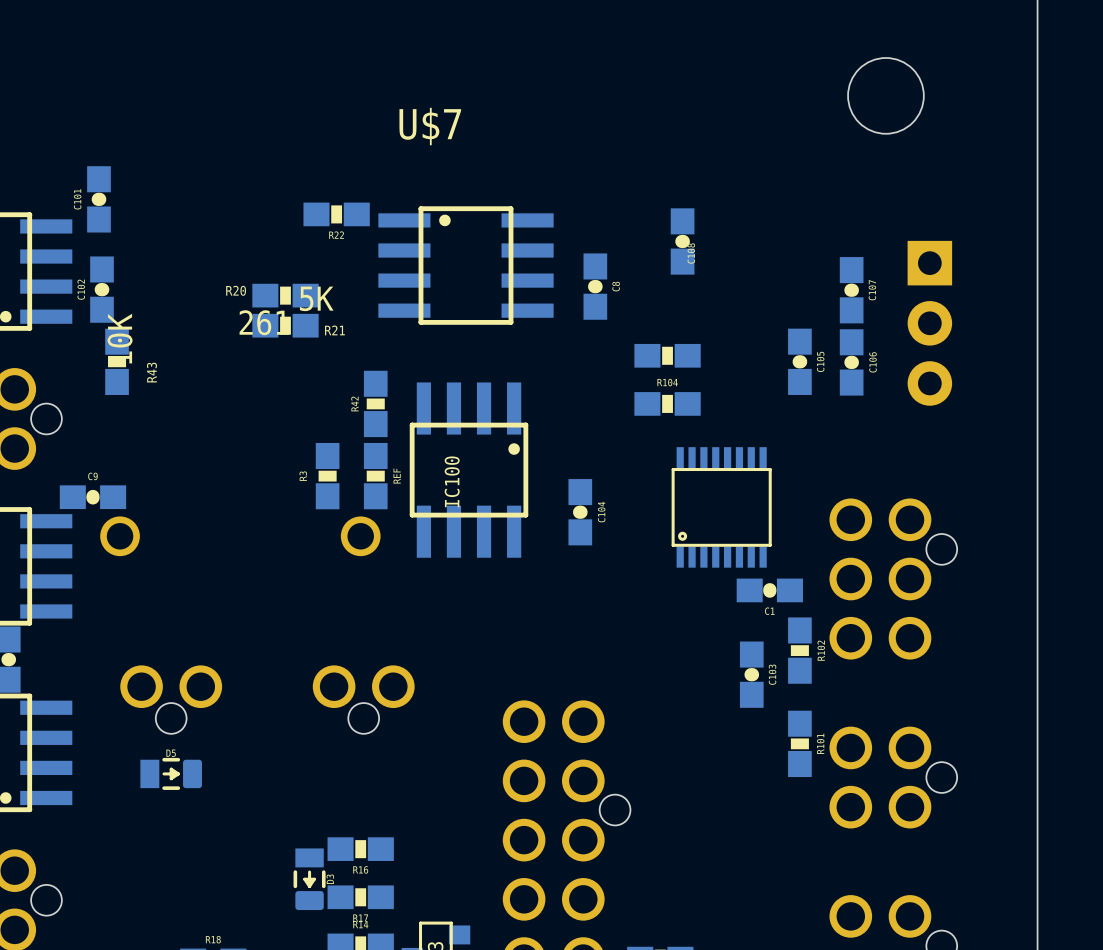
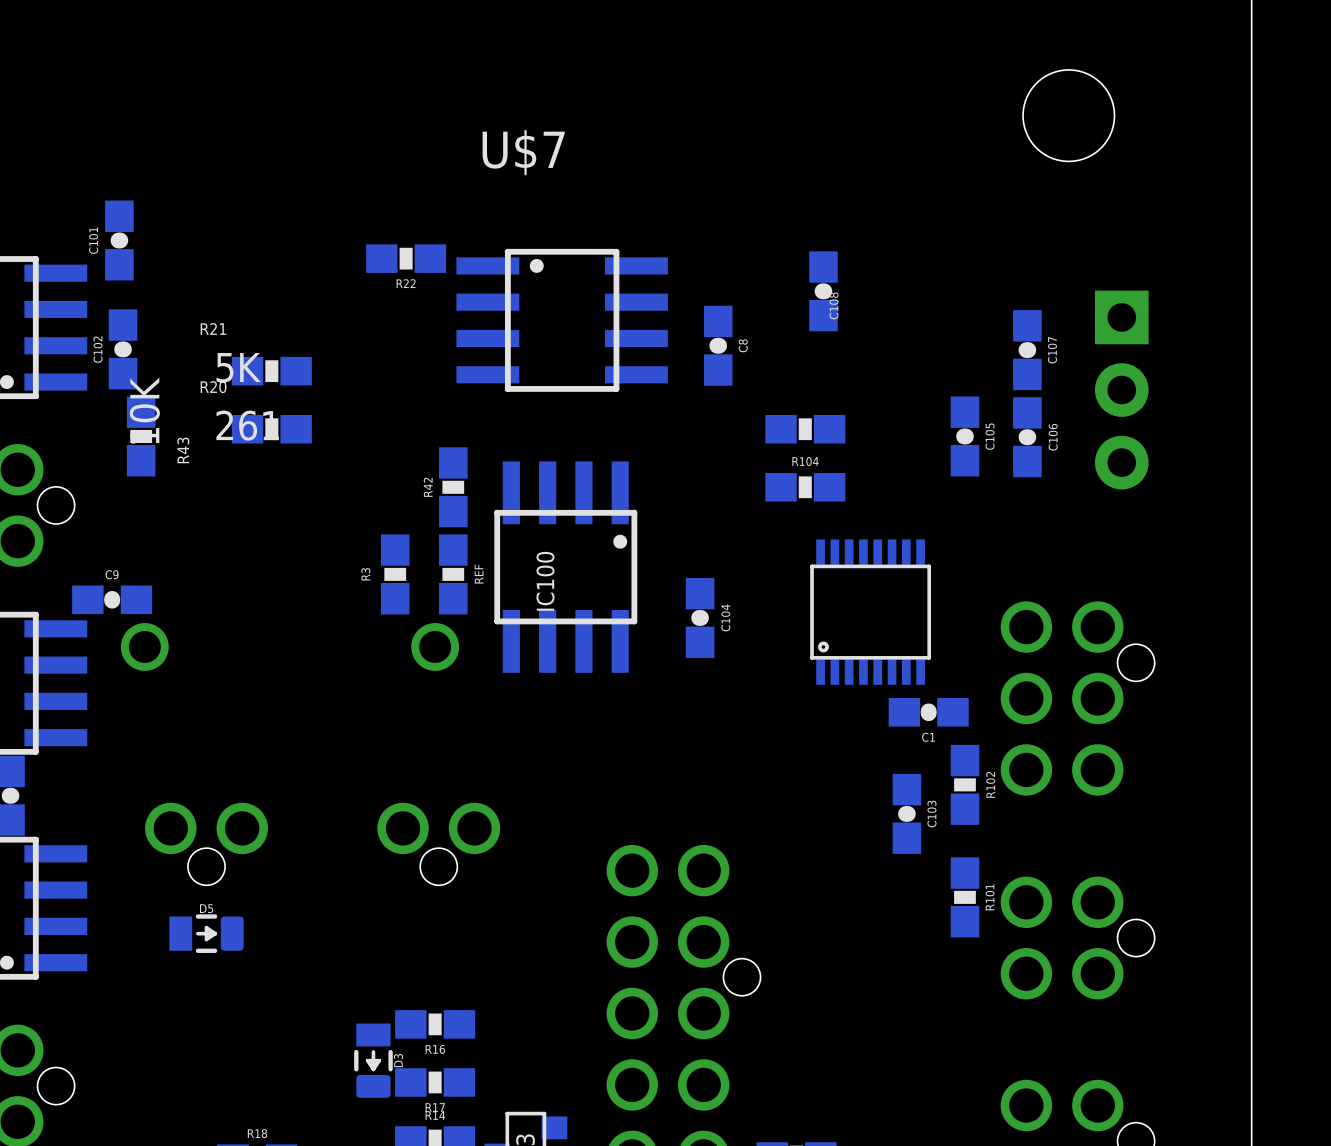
R21 position: (285, 295) -> (271, 371)
R21 value position: 5K (316, 298) -> 5K (238, 367)
R20 position: (285, 325) -> (271, 429)
R21 name position: R21 (334, 330) -> R21 (213, 328)

